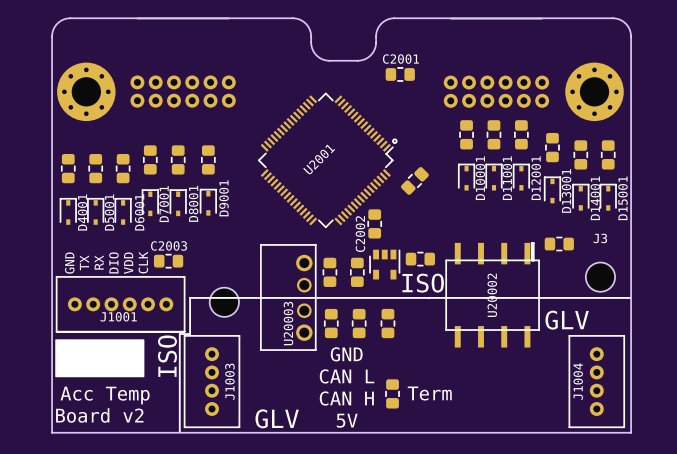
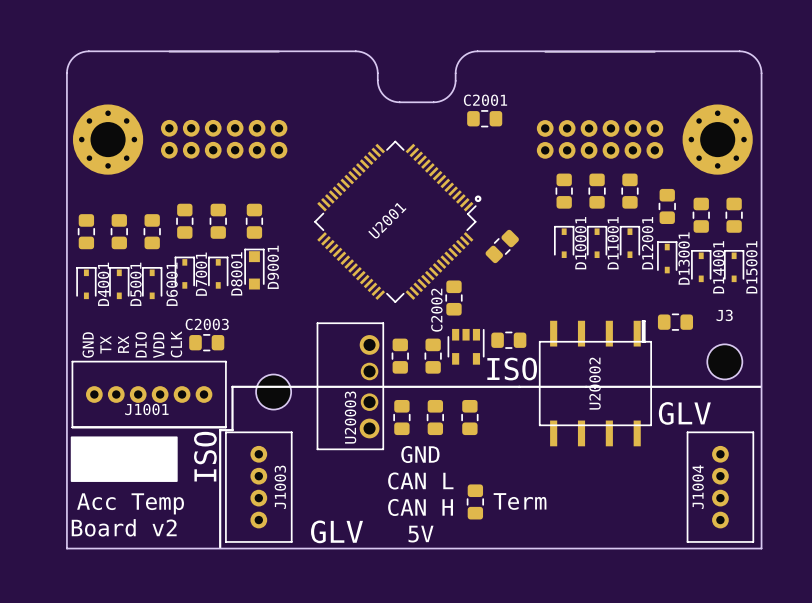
D9001 footprint: [200, 189, 217, 216] -> [244, 248, 265, 290]

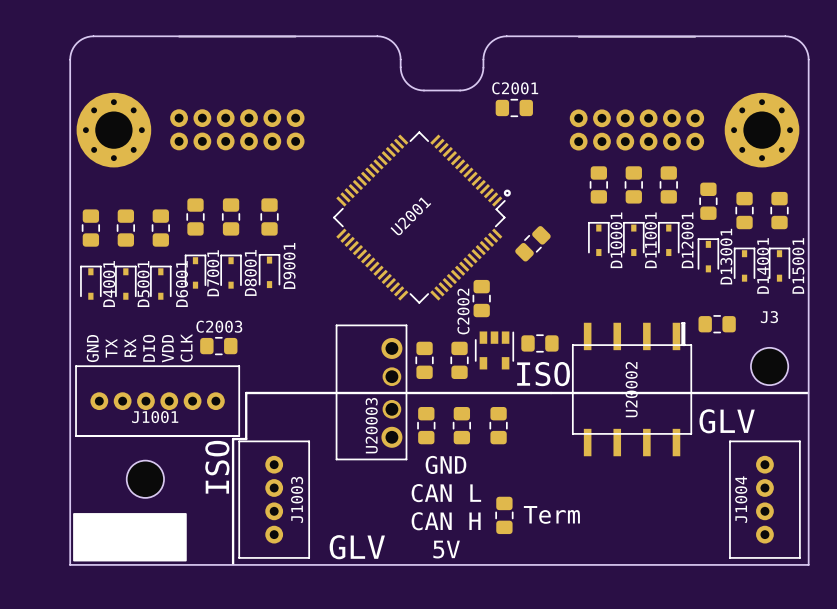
D9001 footprint: [244, 248, 265, 290] -> [258, 254, 281, 289]
part position: (273, 392) -> (145, 479)
drawing position: (124, 459) -> (129, 537)
text: Acc Temp (130, 503) -> none
text: Board v2 (124, 527) -> none

